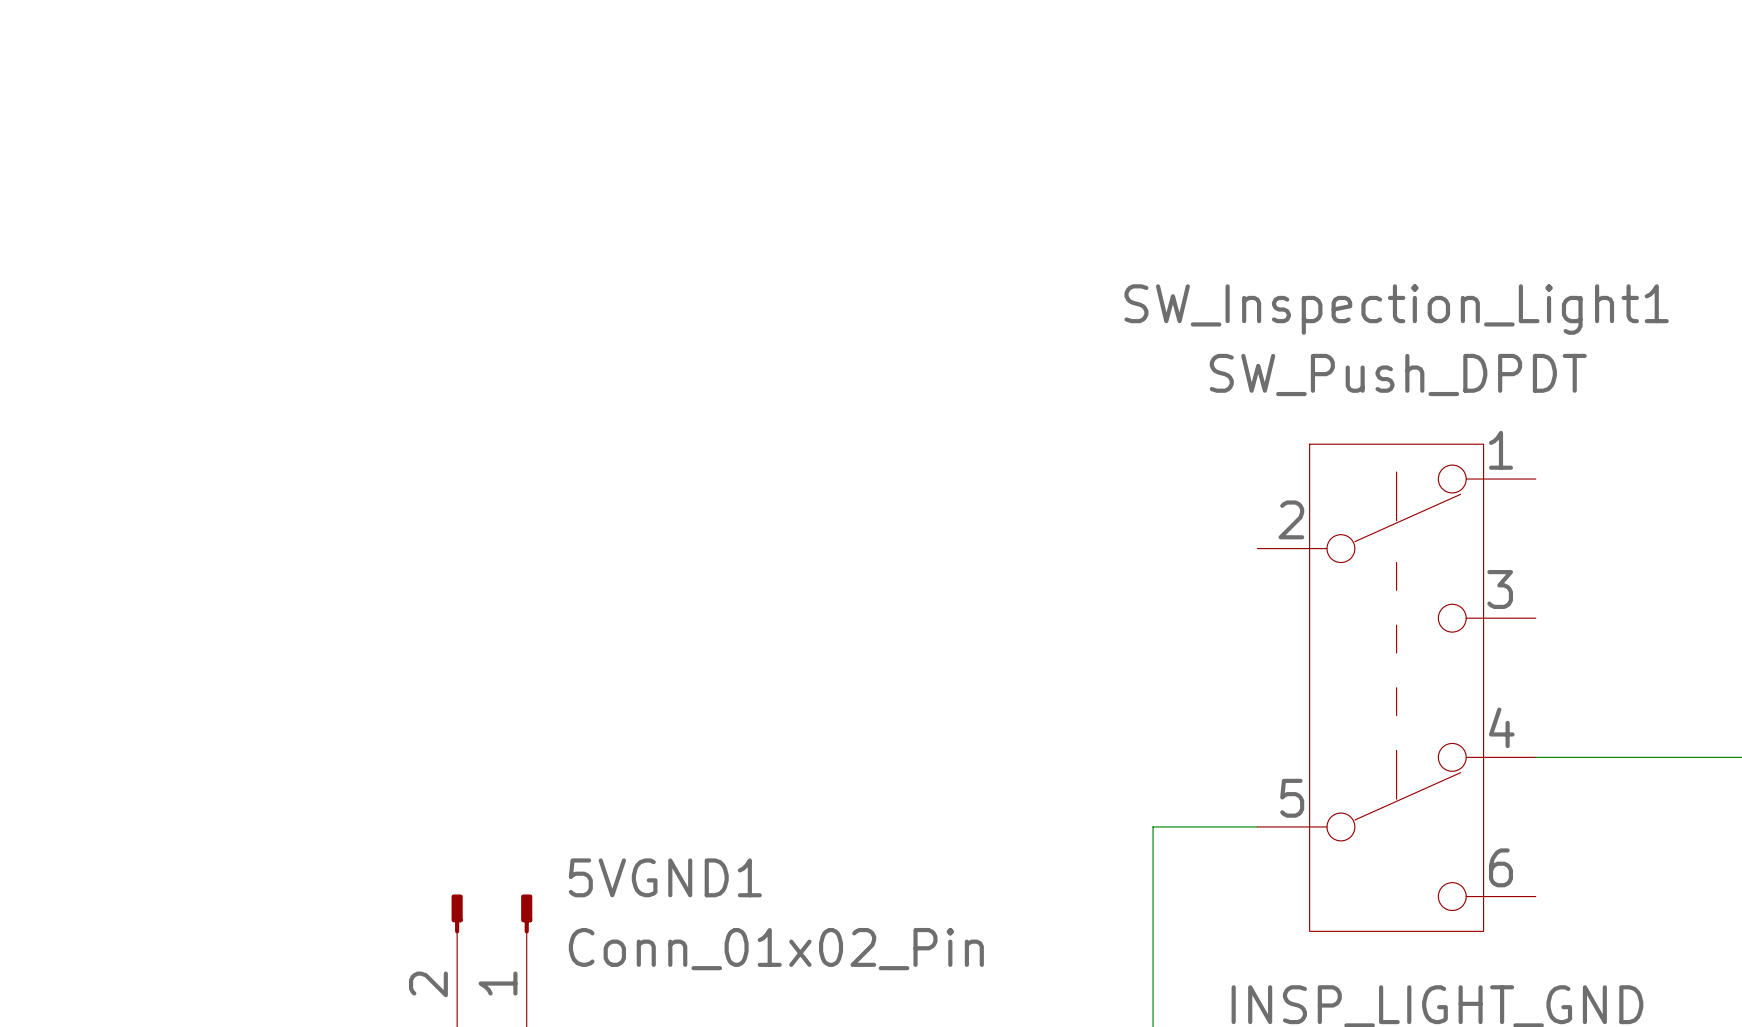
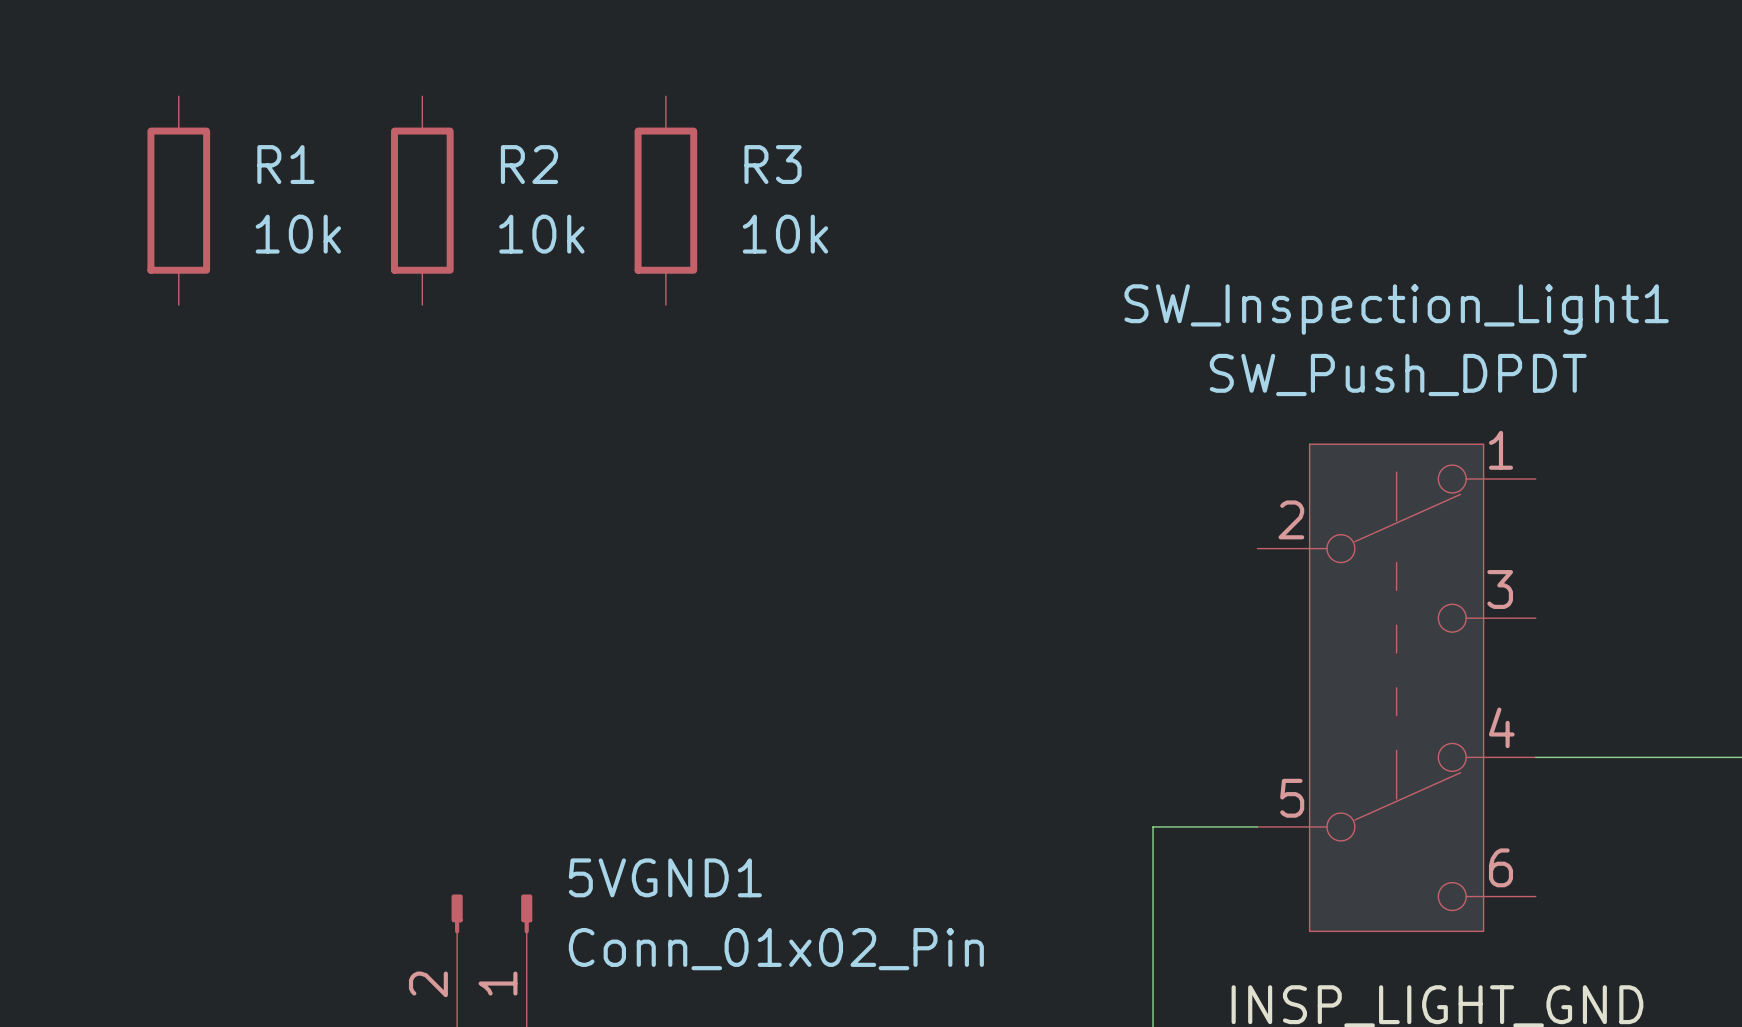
R1: none -> 10k (178, 200)
R2: none -> 10k (422, 200)
R3: none -> 10k (665, 200)

